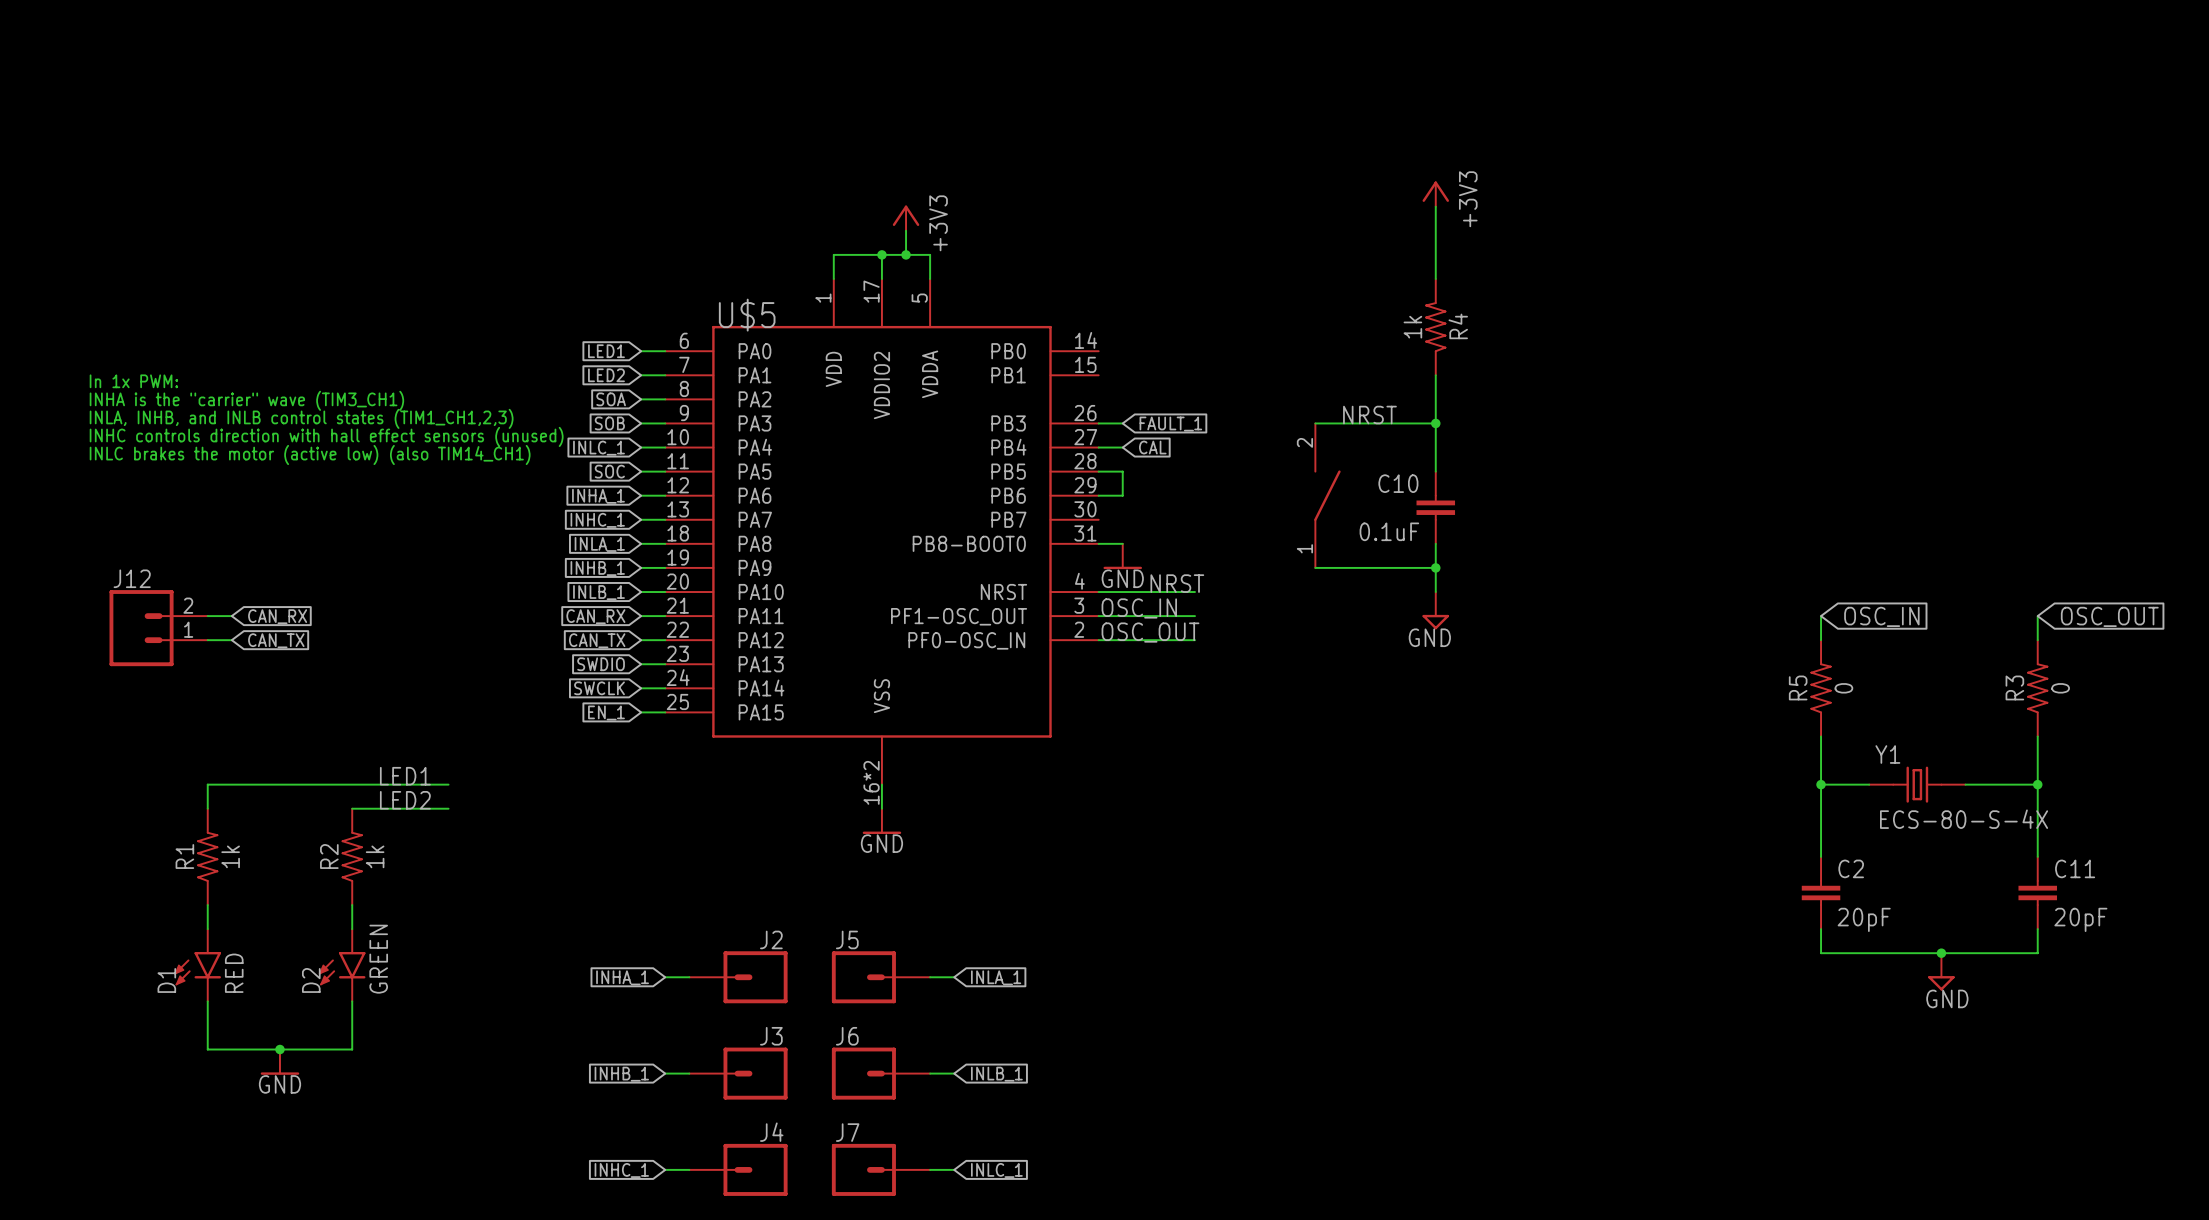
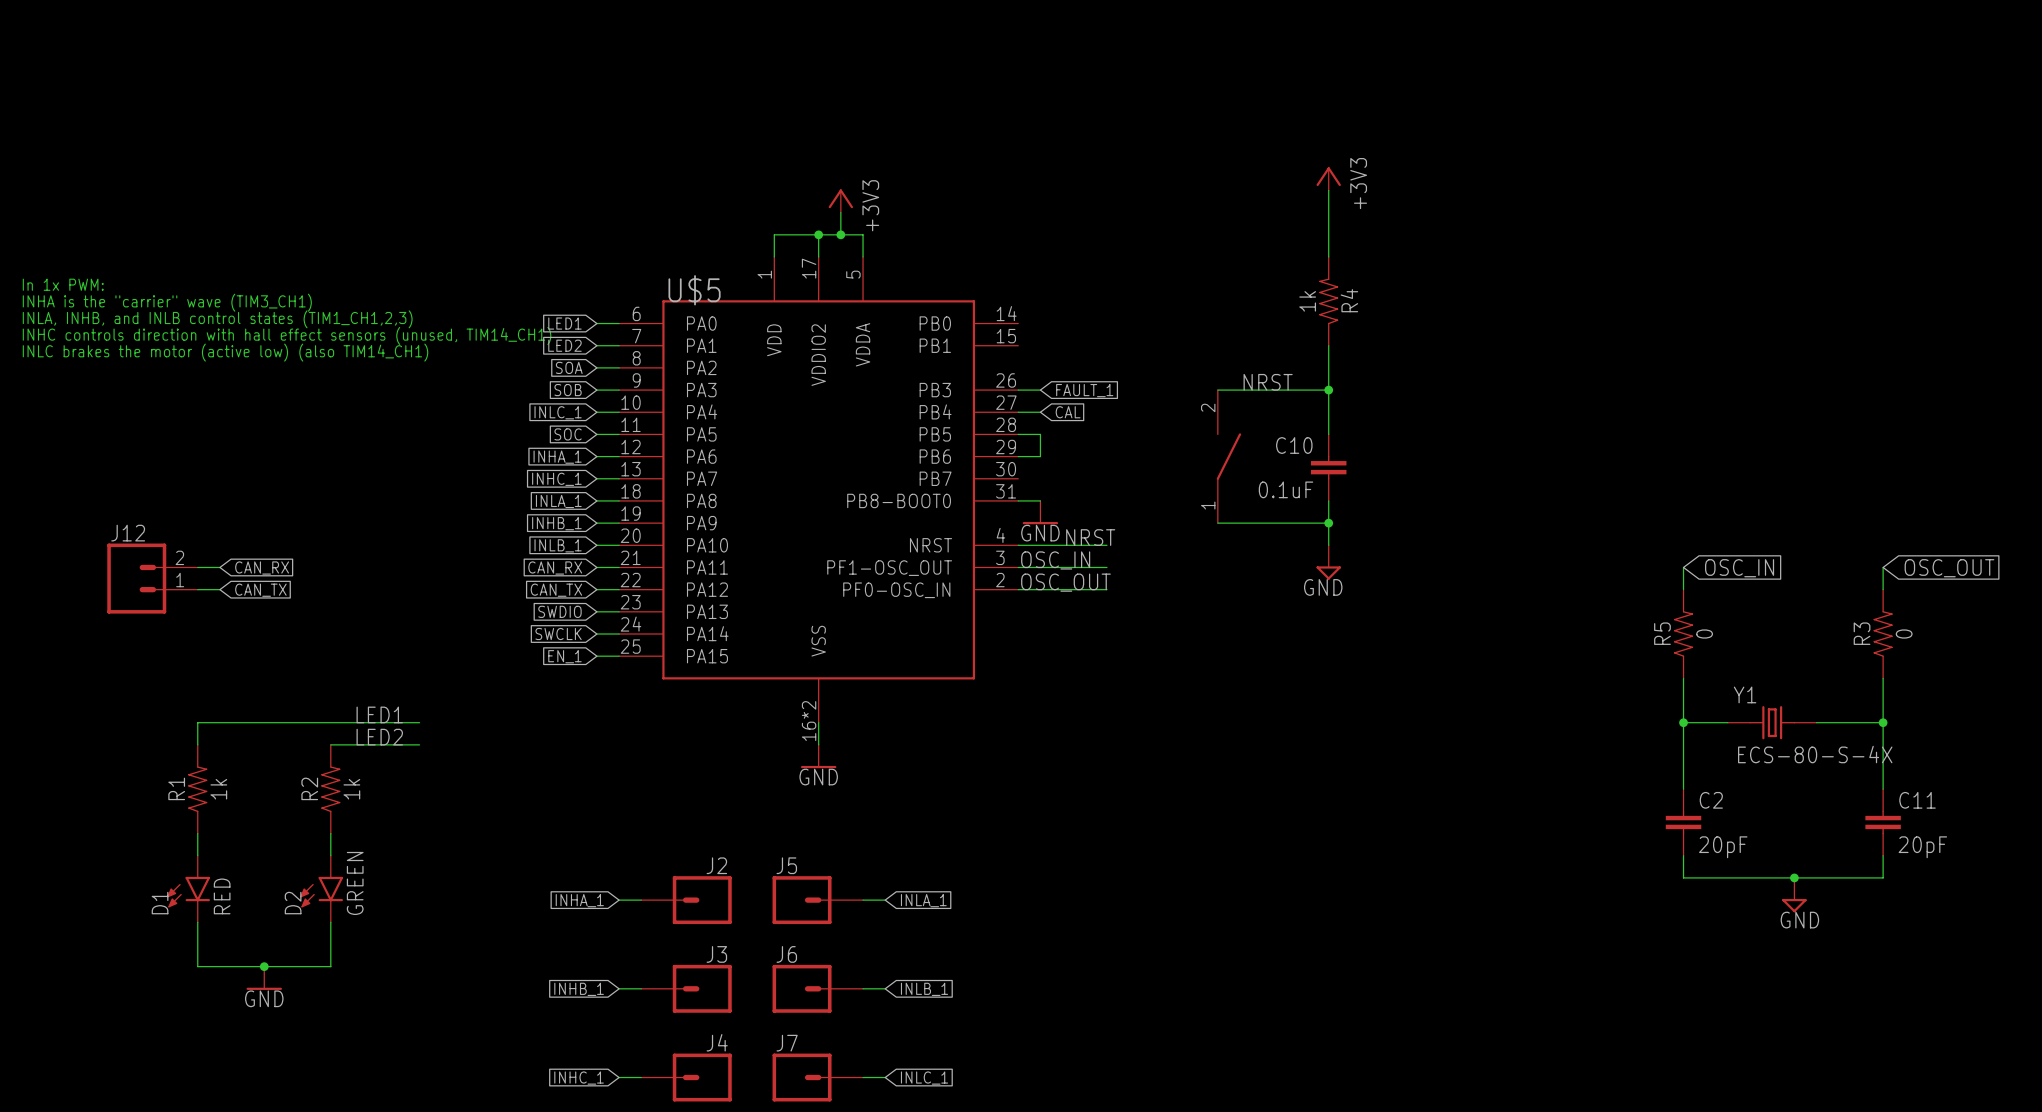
text: none -> INHC controls direction with hall effect sensors (unused, TIM14_CH1) (287, 335)
text position: In 1x PWM: (133, 381) -> In 1x PWM: (63, 284)
text position: INHA is the "carrier" wave (TIM3_CH1) (246, 400) -> INHA is the "carrier" wave (TIM3_CH1) (167, 302)
text position: INLA, INHB, and INLB control states (TIM1_CH1,2,3) (301, 418) -> INLA, INHB, and INLB control states (TIM1_CH1,2,3) (217, 319)
text: INHC controls direction with hall effect sensors (unused) (326, 436) -> none
text position: INLC brakes the motor (active low) (also TIM14_CH1) (310, 454) -> INLC brakes the motor (active low) (also TIM14_CH1) (225, 352)

